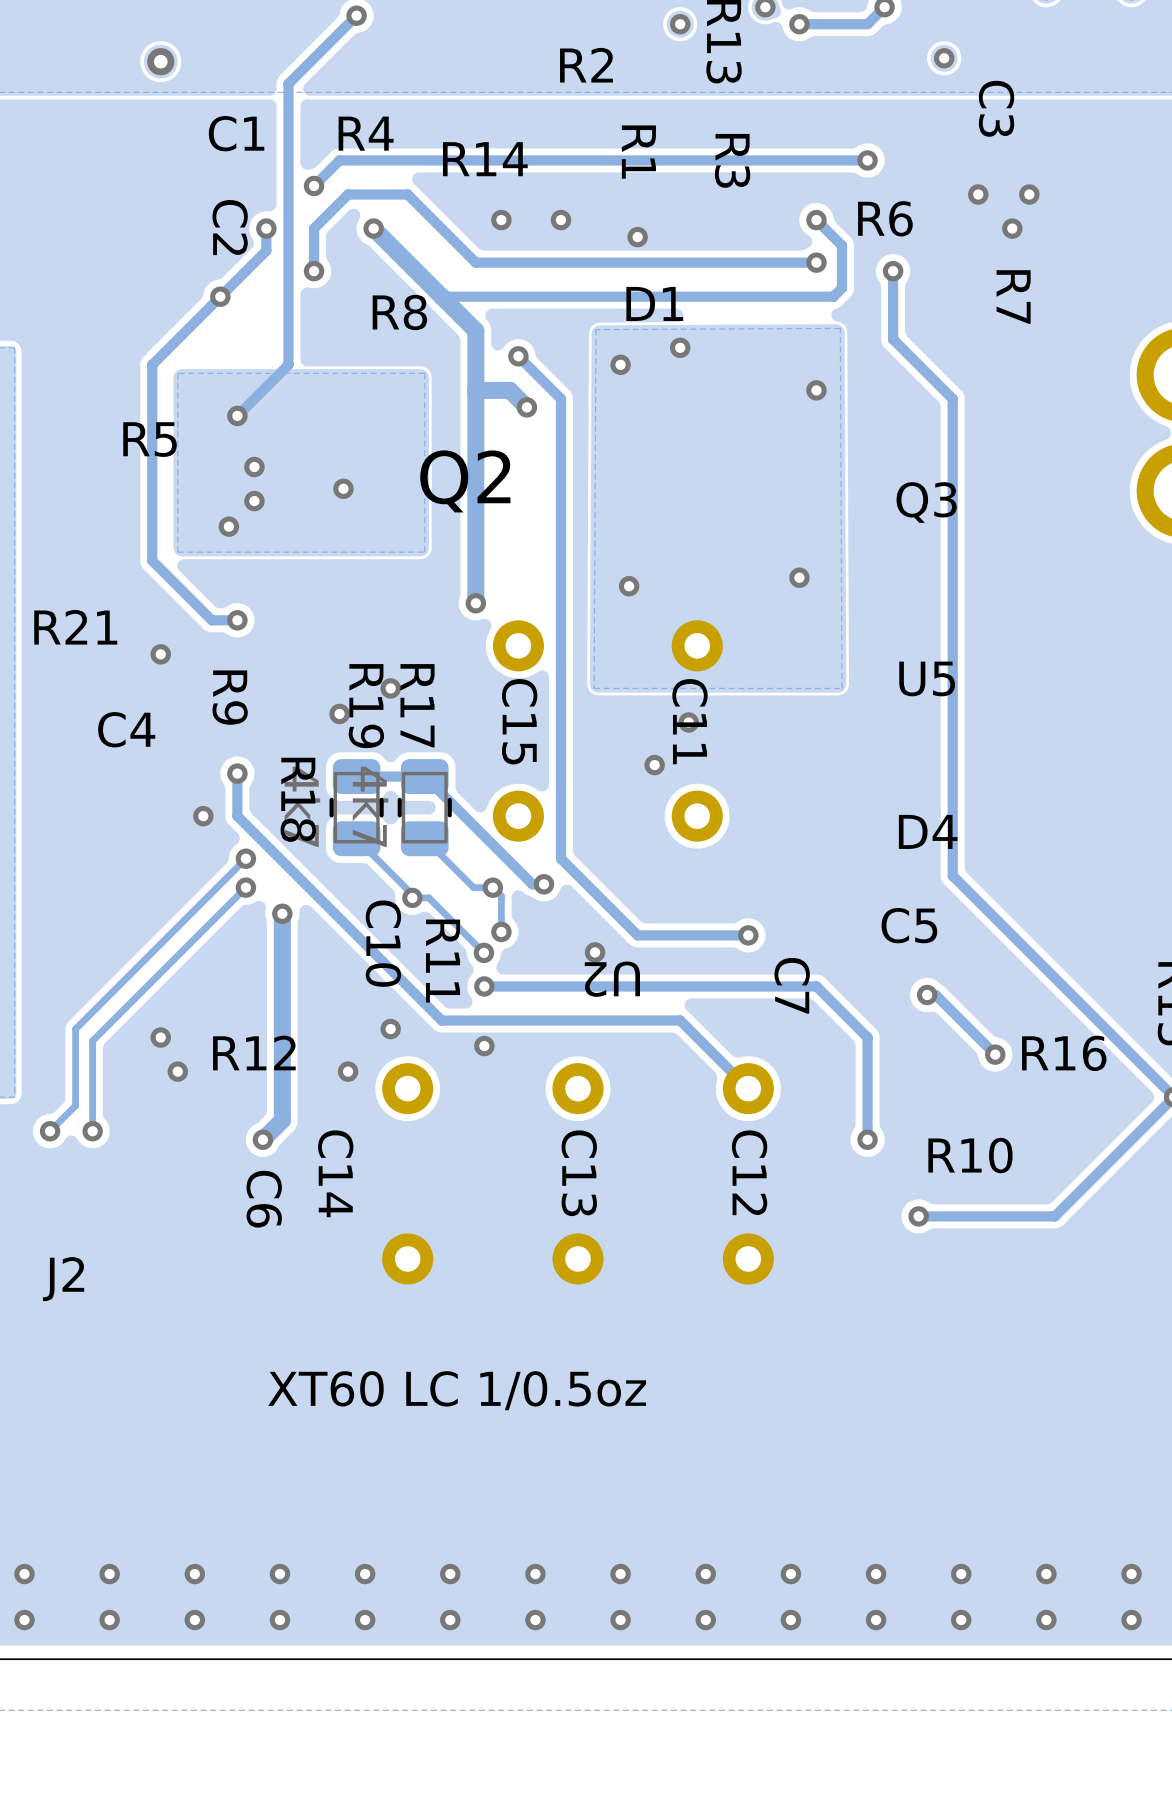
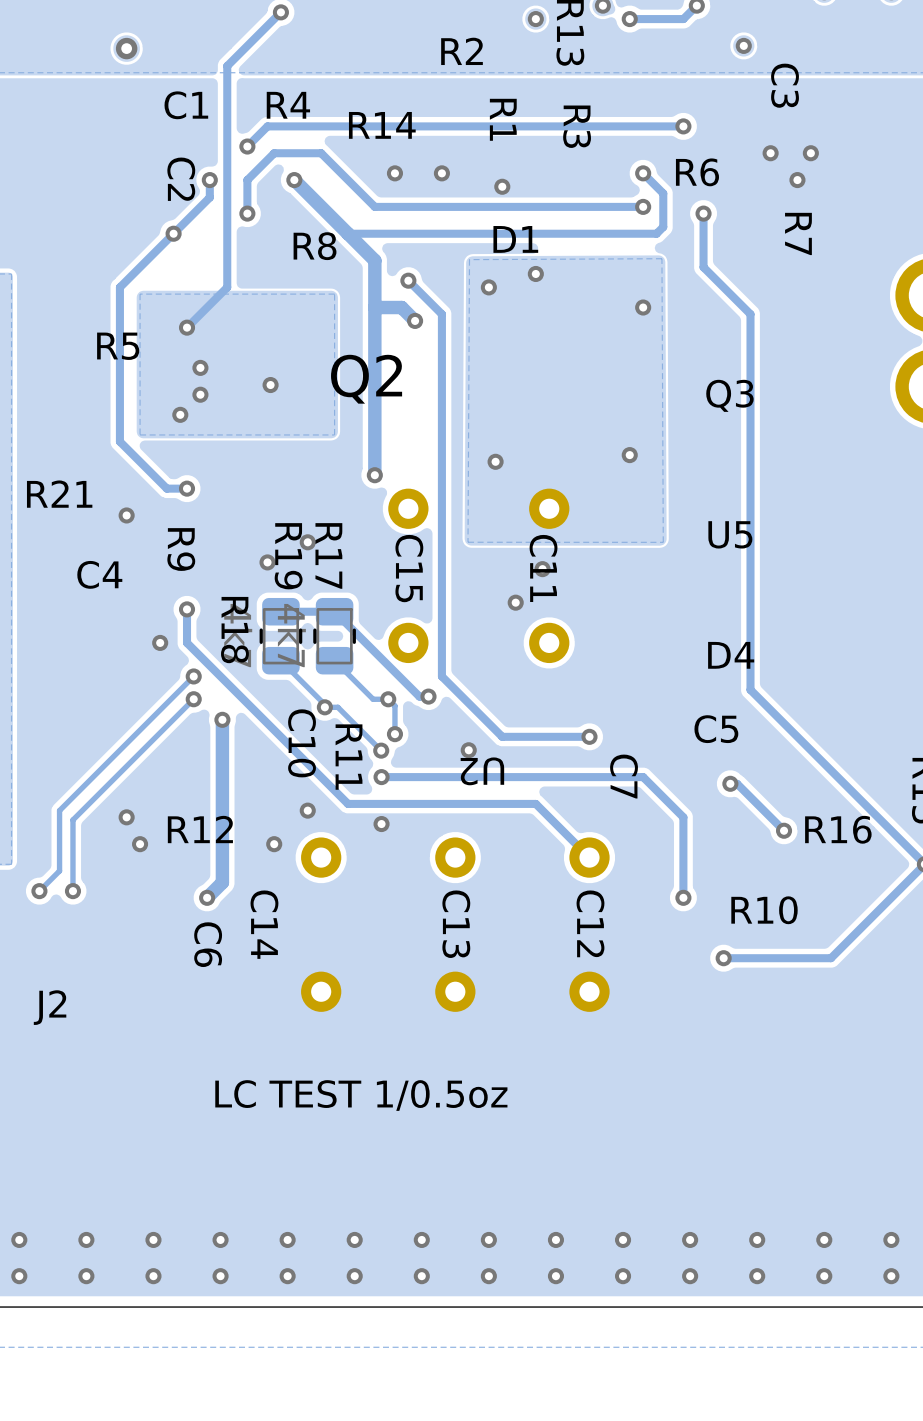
text: XT60 LC 1/0.5oz (457, 1390) -> LC TEST 1/0.5oz (361, 1095)

